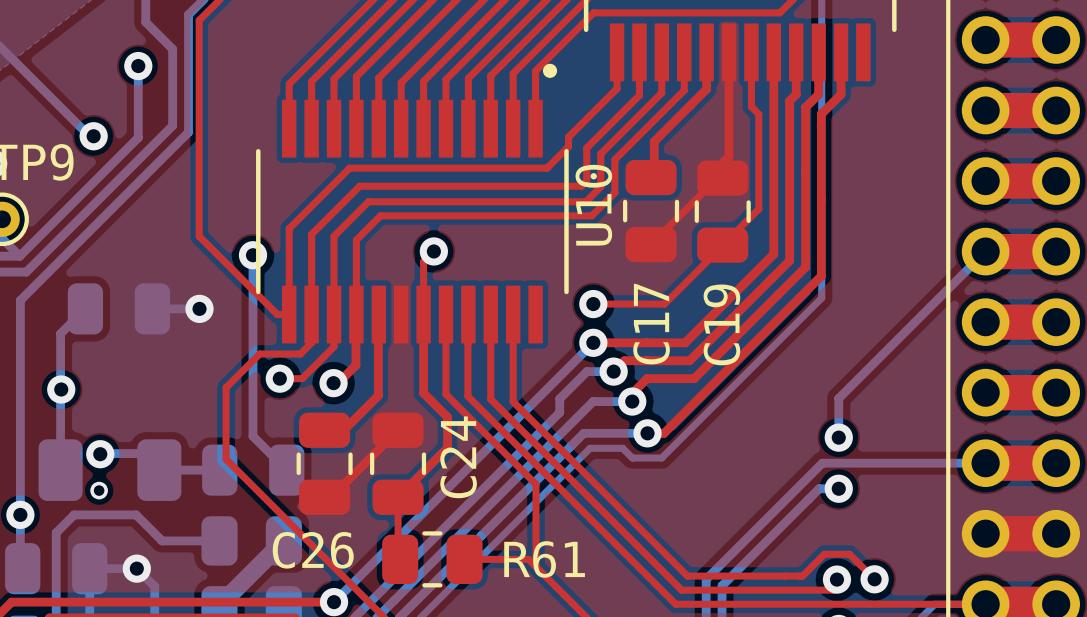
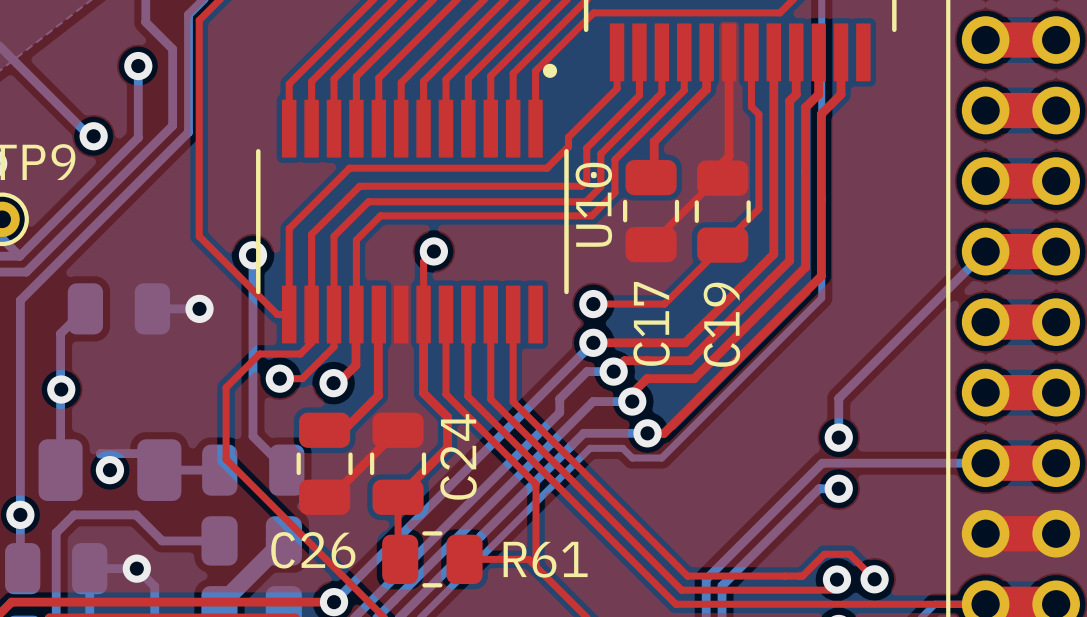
via position: (100, 454) -> (109, 470)
via: (99, 490) -> none

